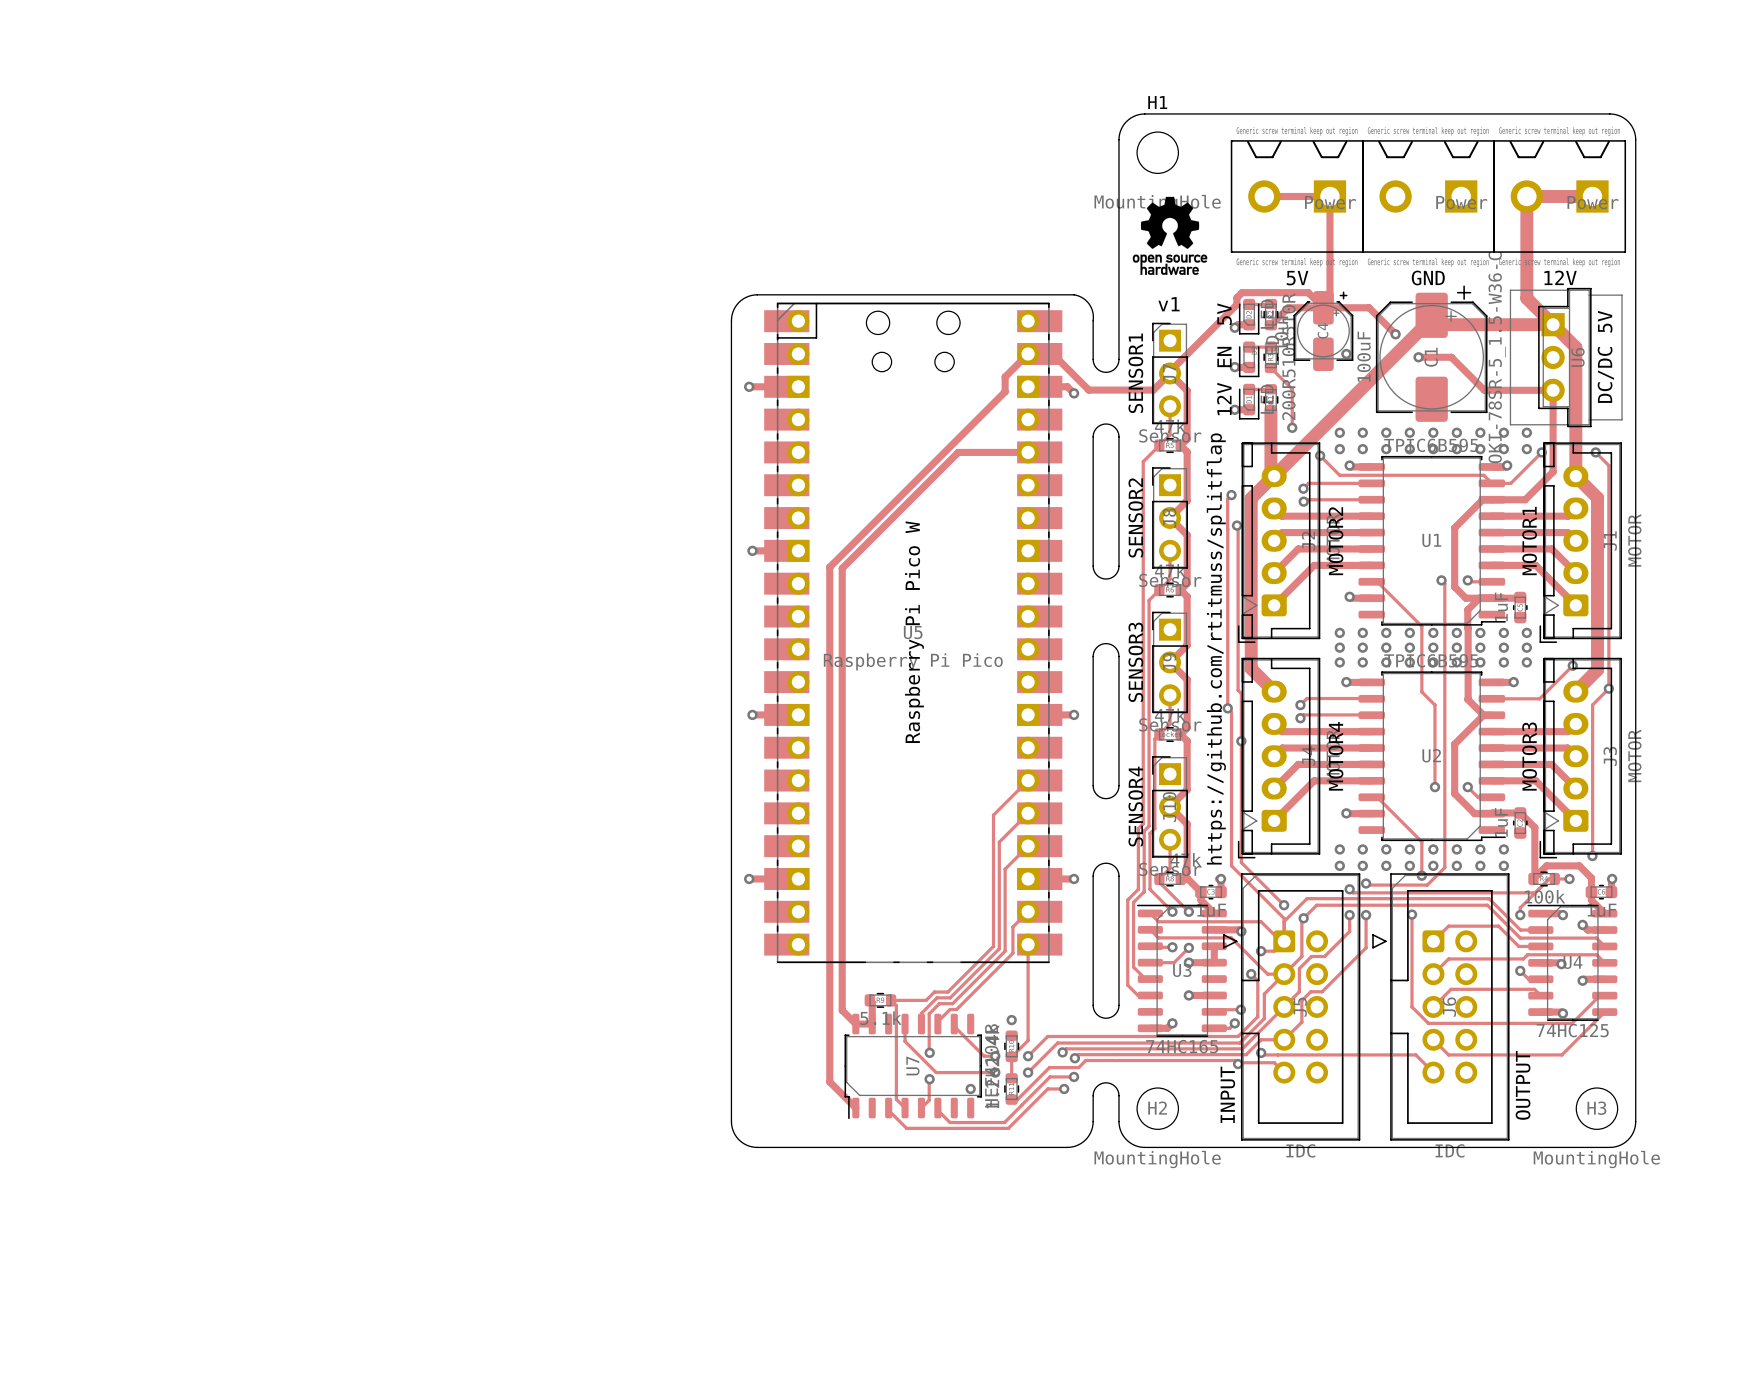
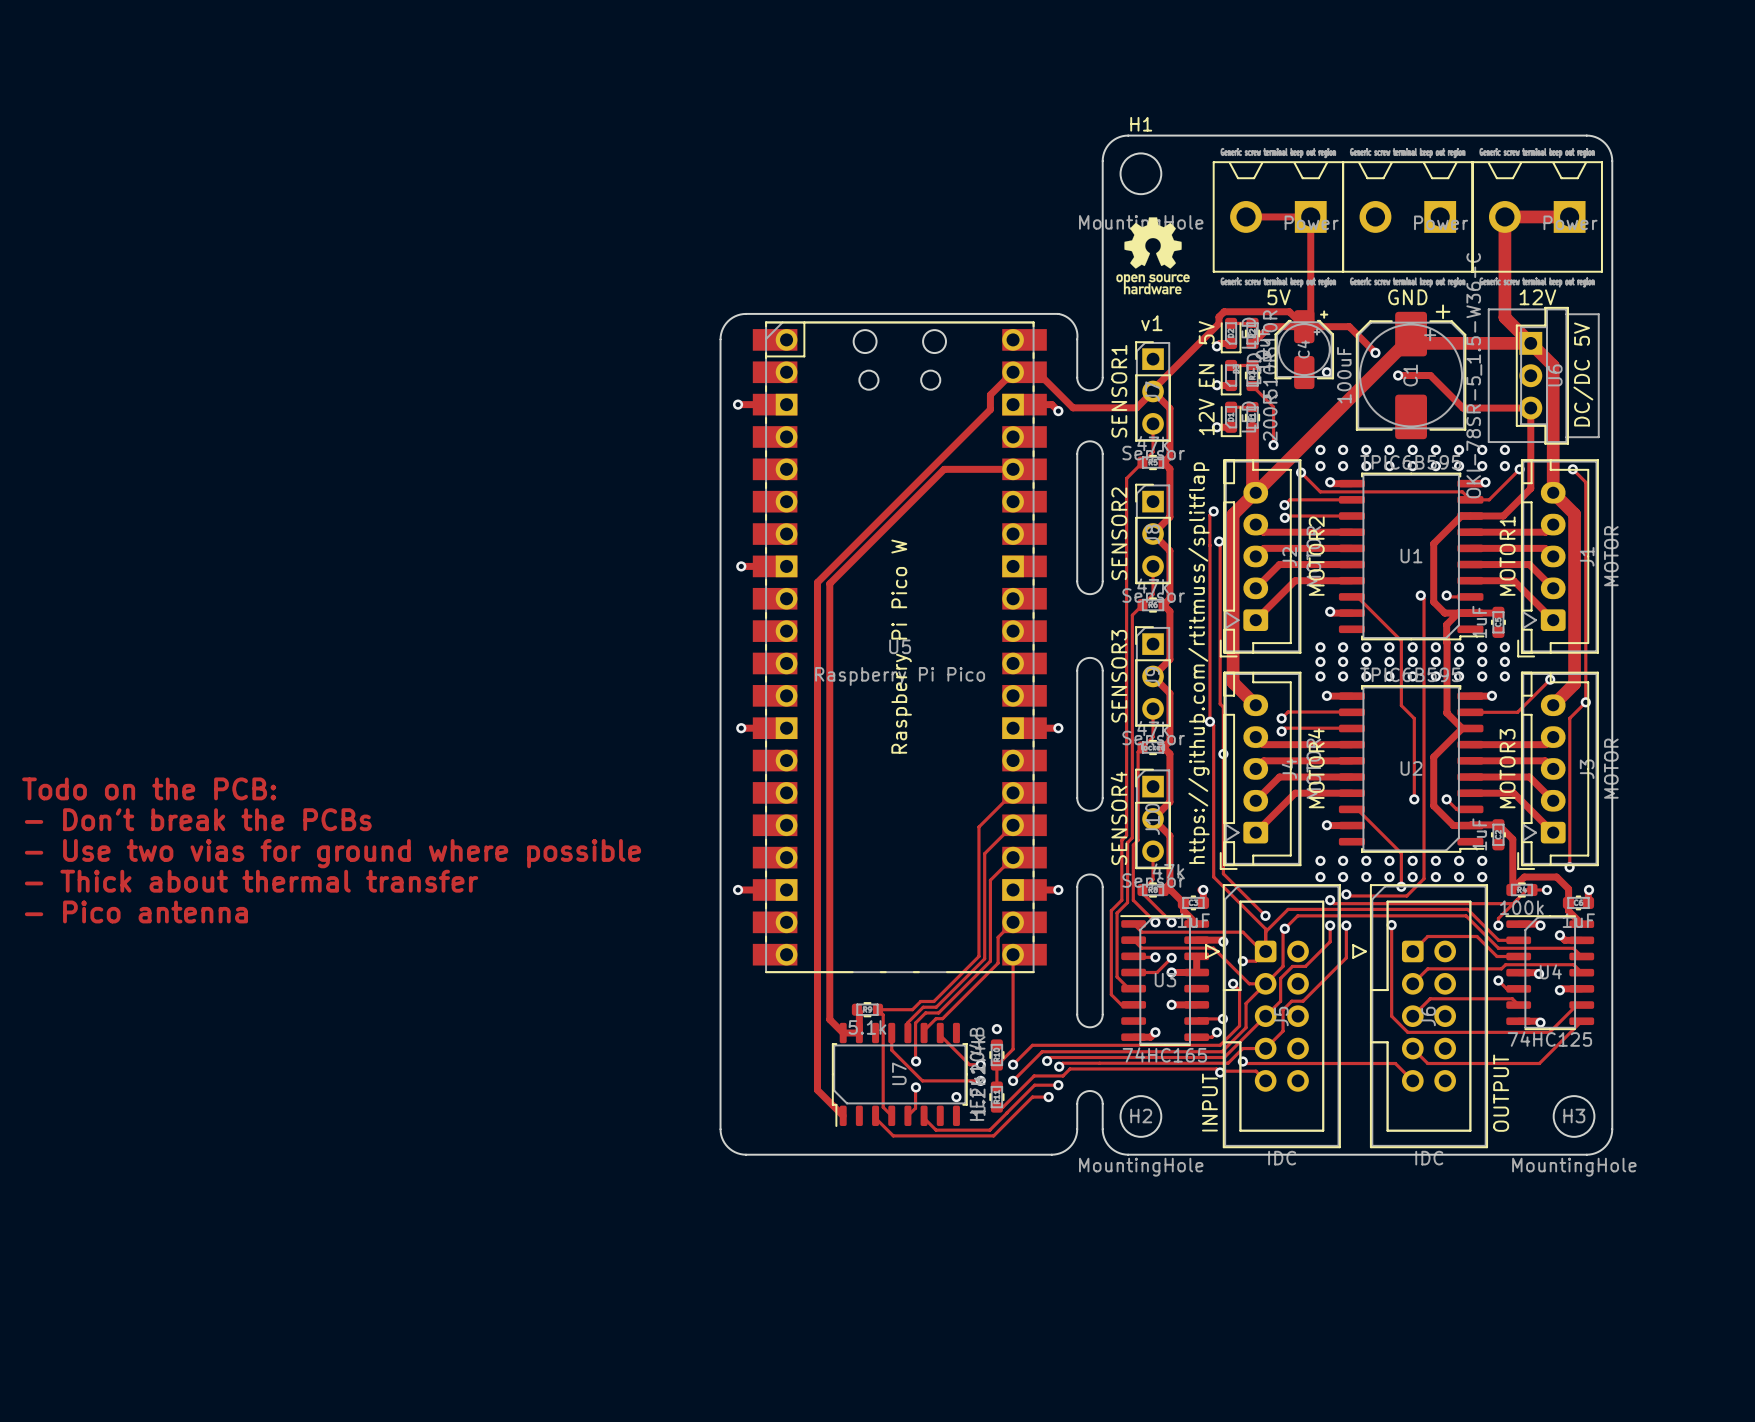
text: none -> Todo on the PCB: (149, 788)
text: none -> - Don't break the PCBs (198, 819)
text: none -> - Use two vias for ground where possible (332, 853)
text: none -> - Thick about thermal transfer (251, 881)
text: none -> - Pico antenna (136, 911)

